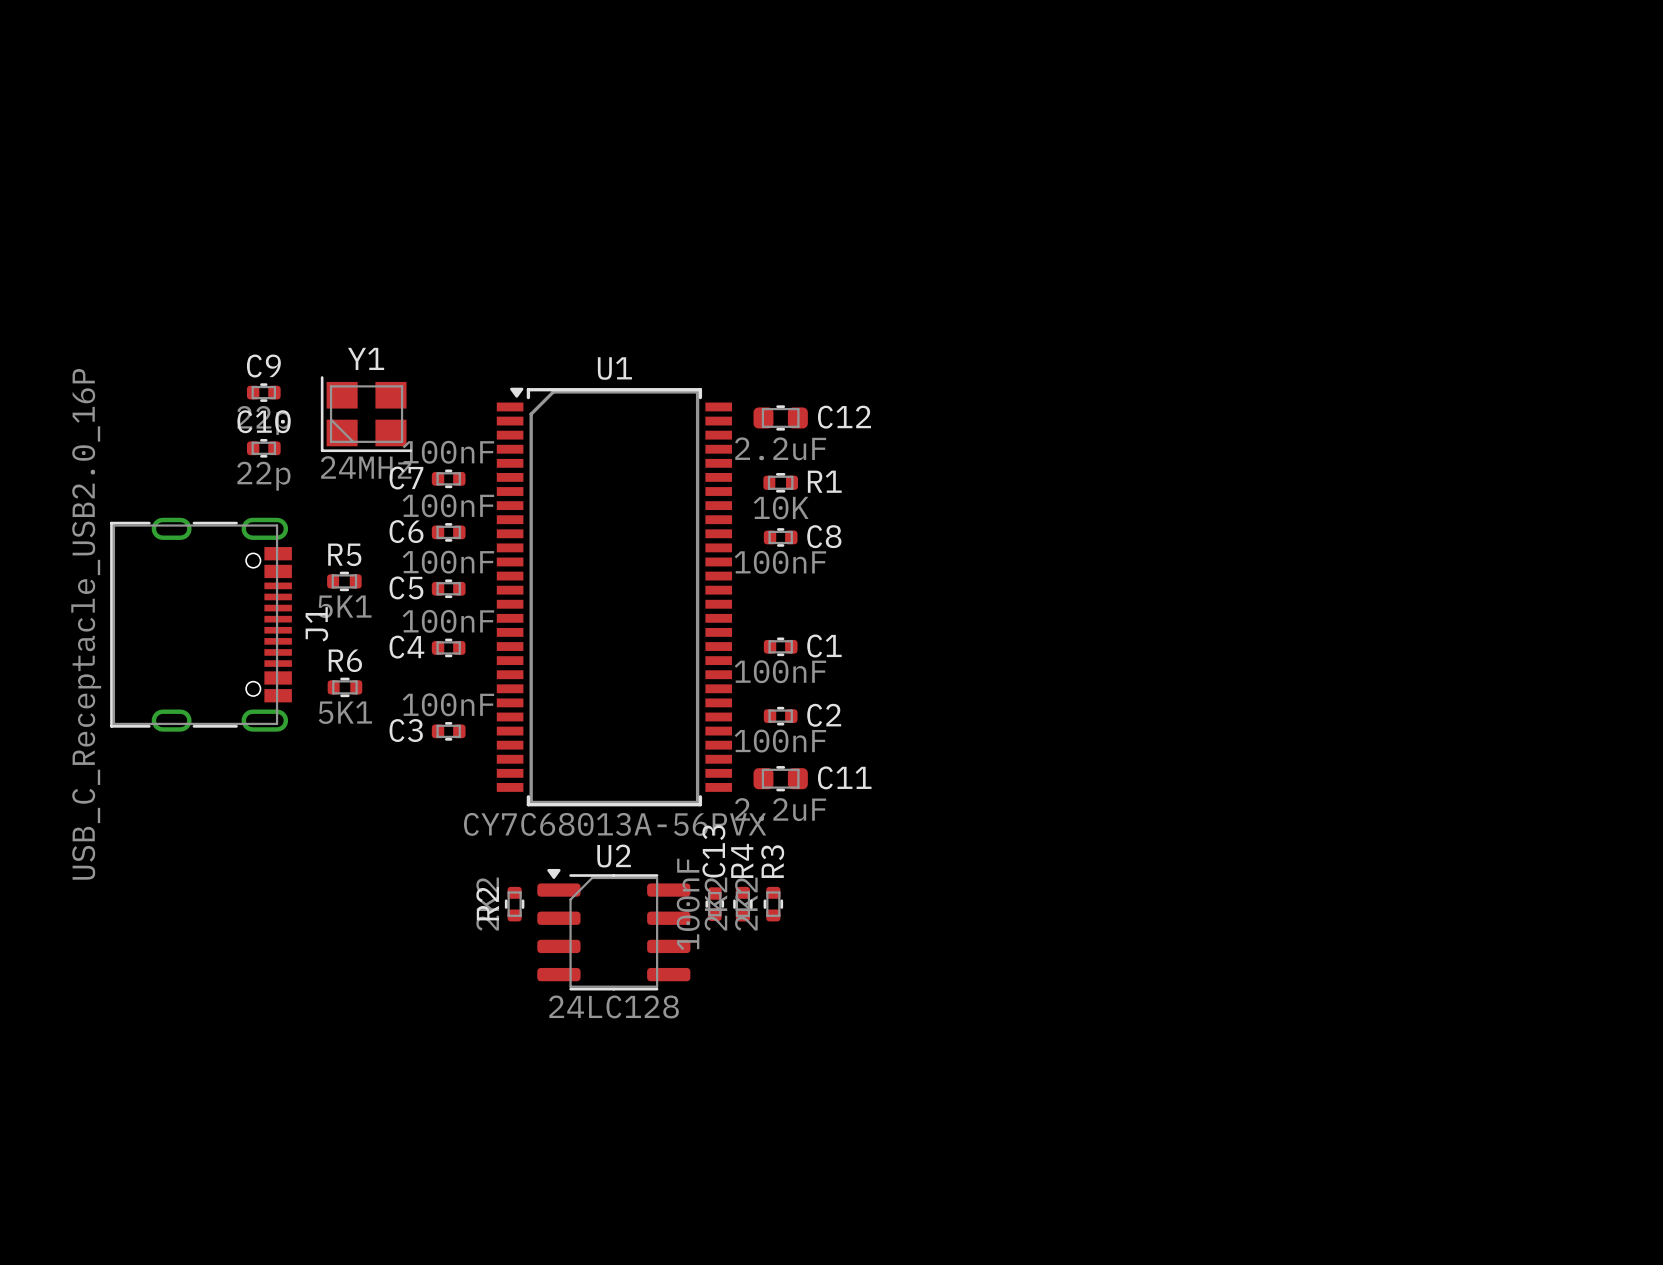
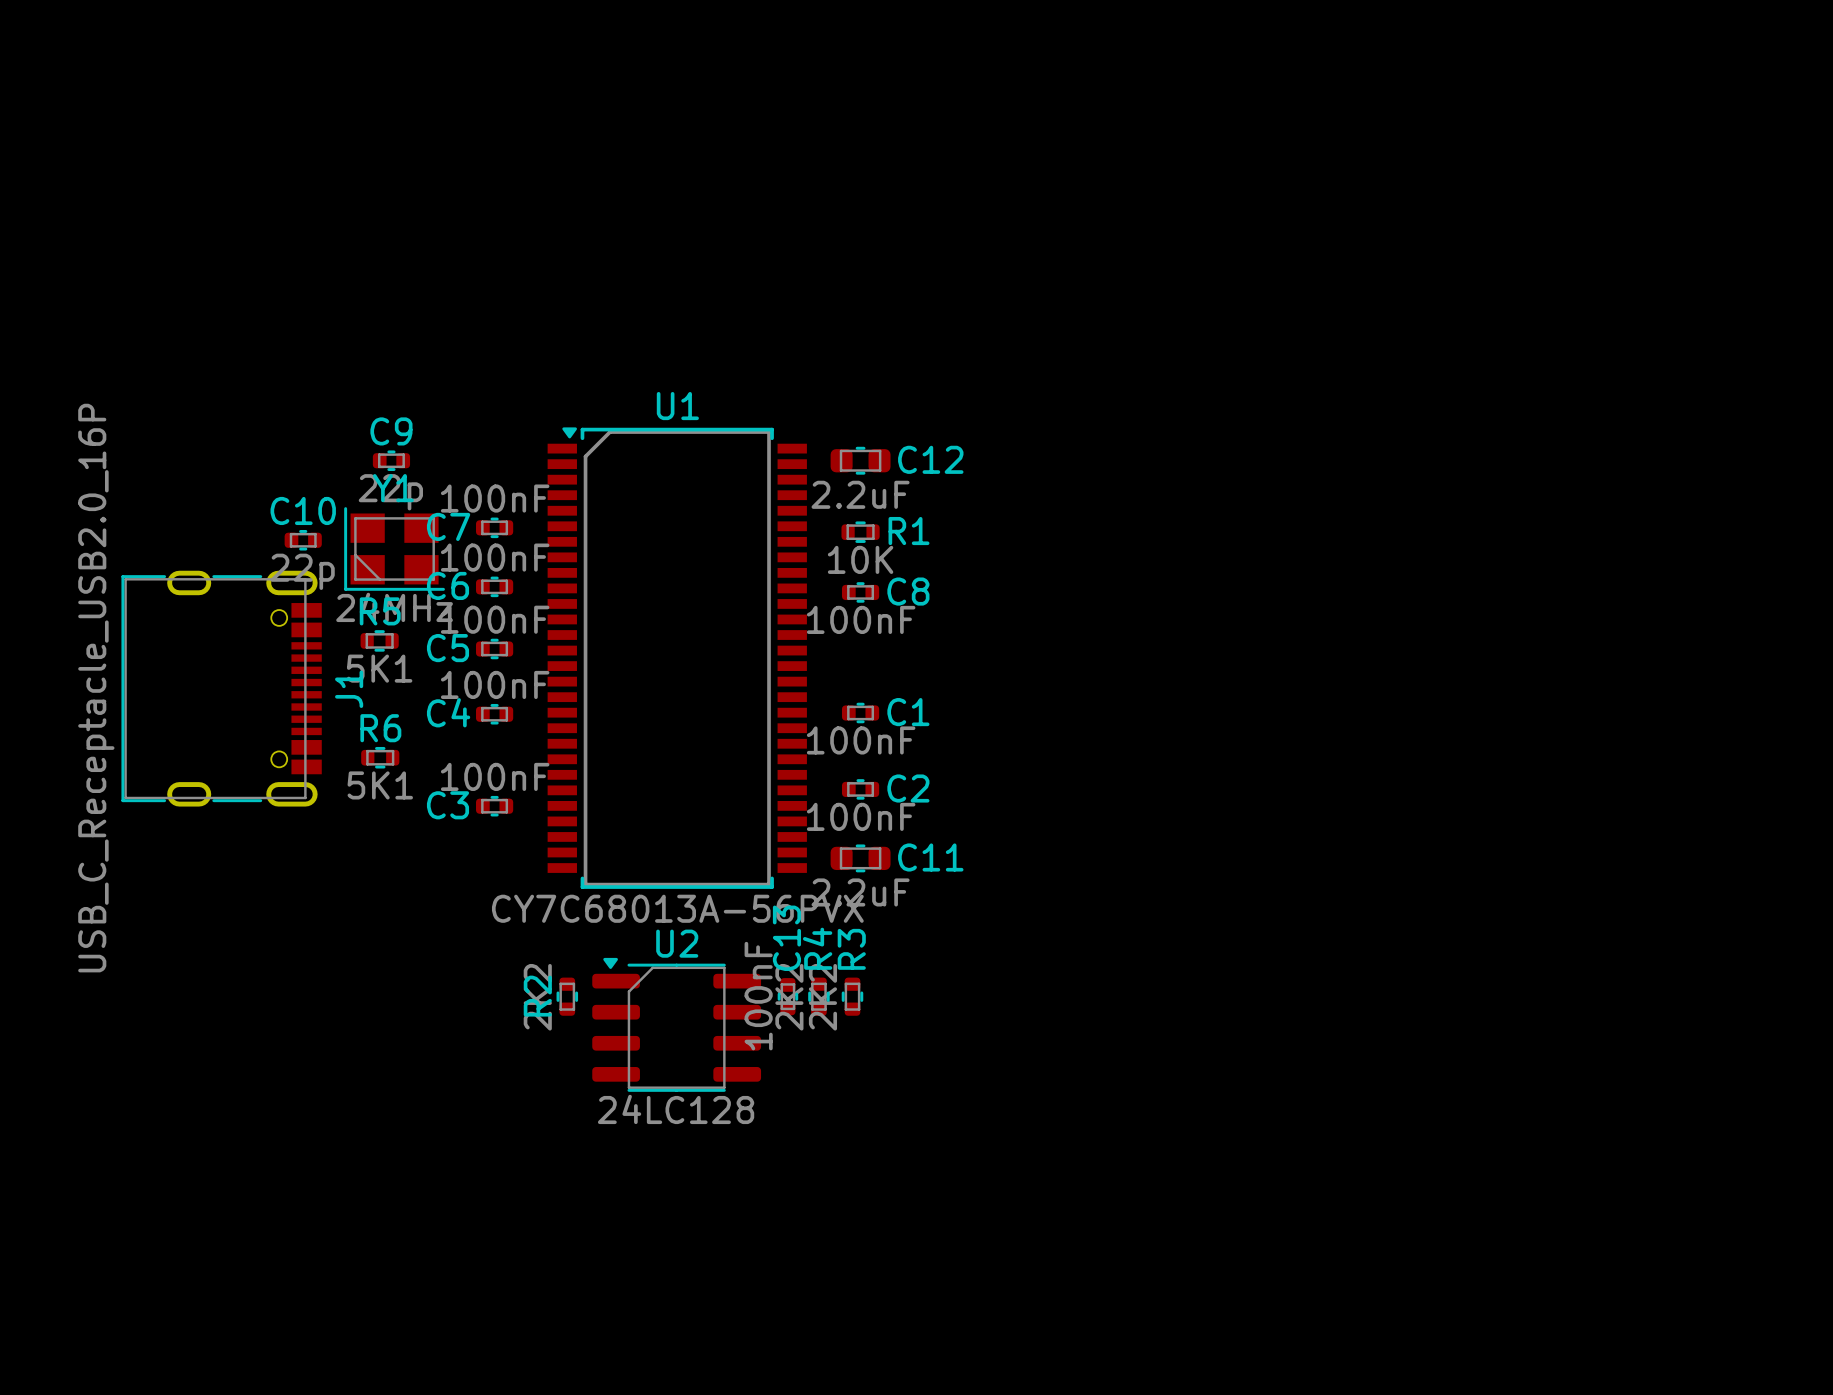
C9 position: (263, 392) -> (391, 460)
Y1 position: (366, 414) -> (394, 548)
C10 position: (263, 448) -> (303, 540)

